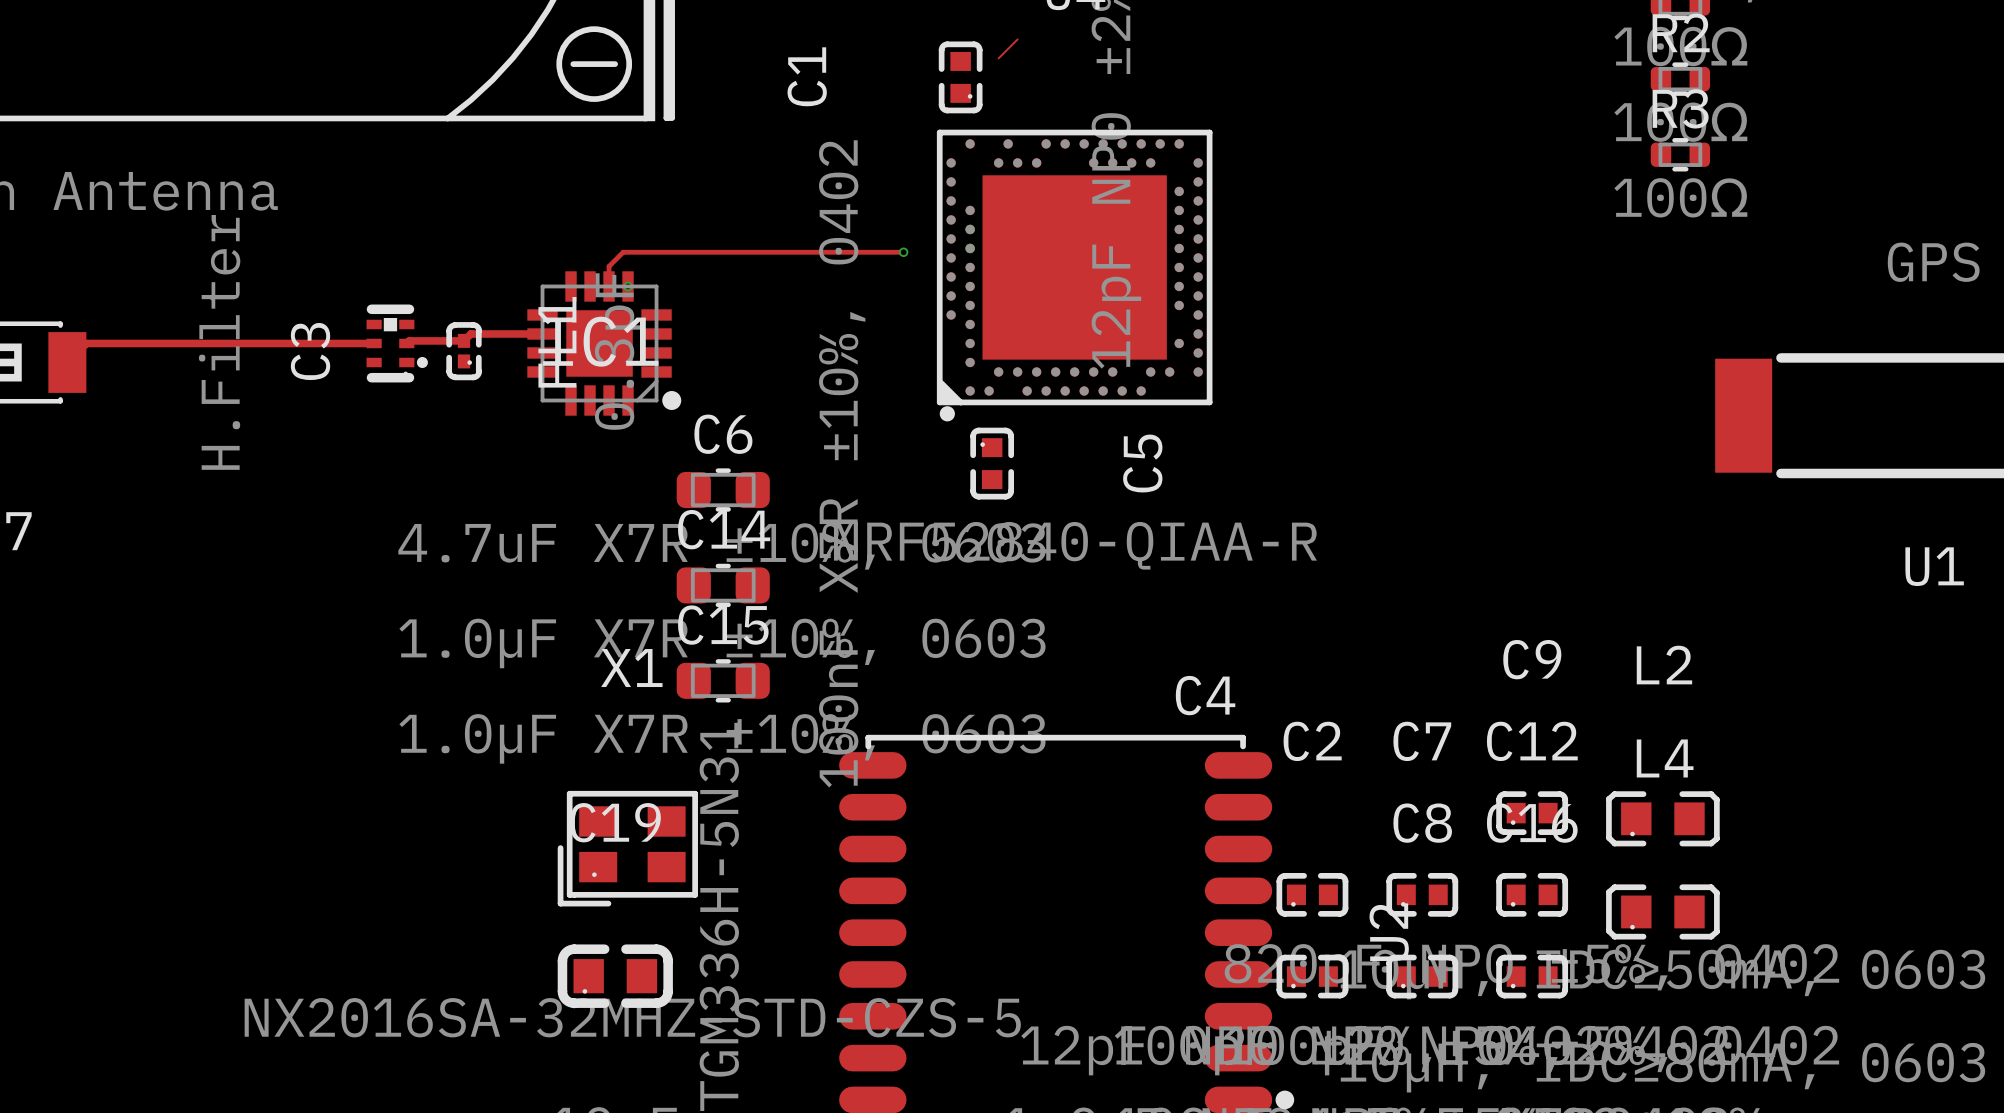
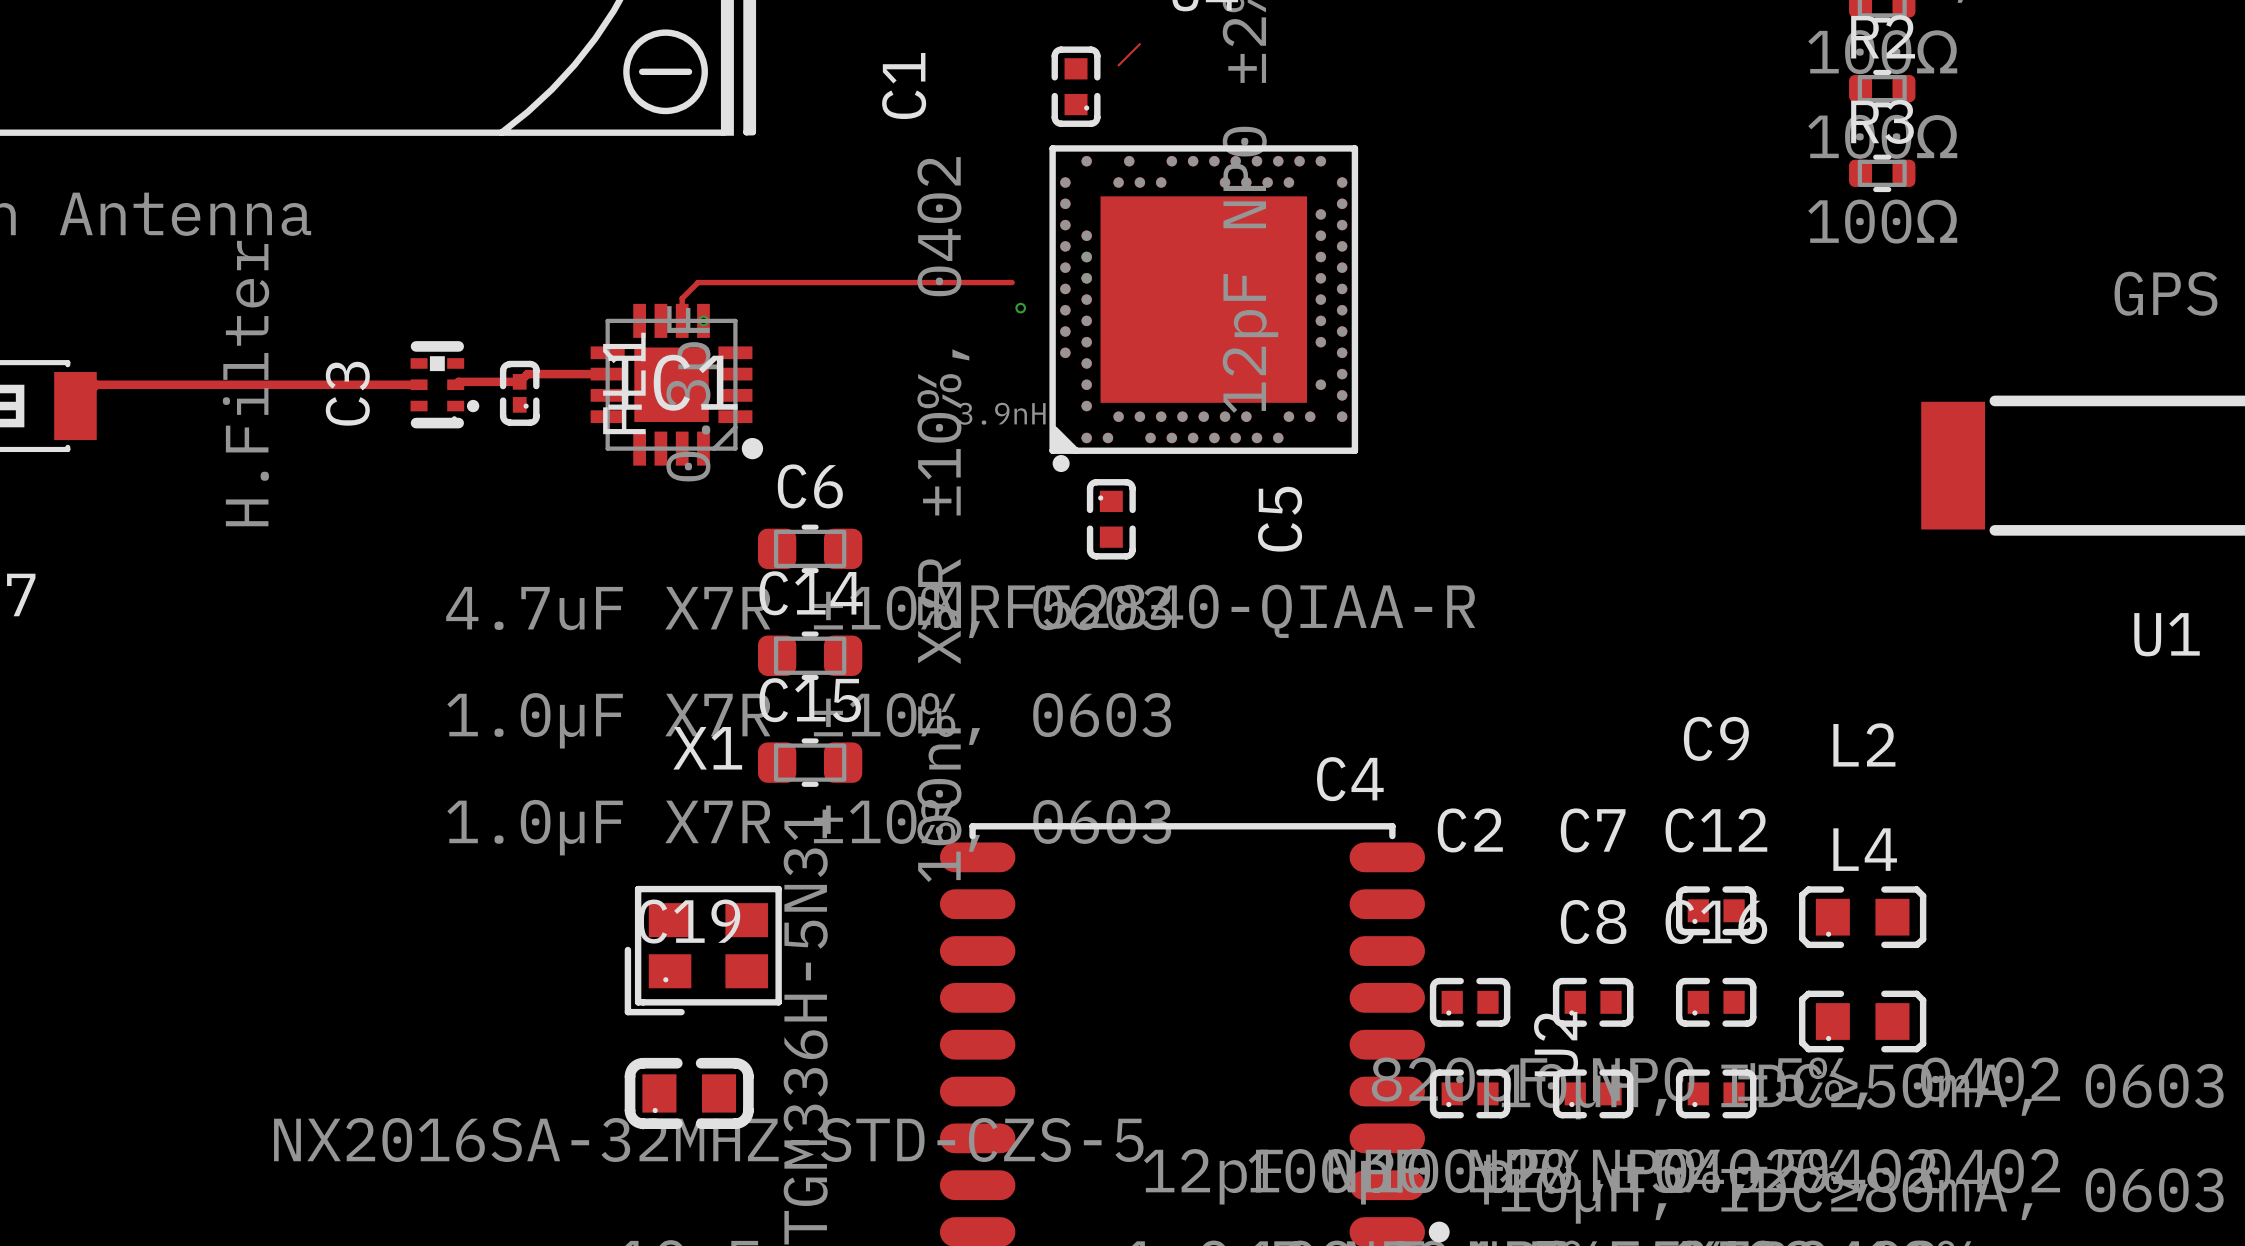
via position: (903, 252) -> (1020, 308)
text: none -> 3.9nH (1001, 413)

